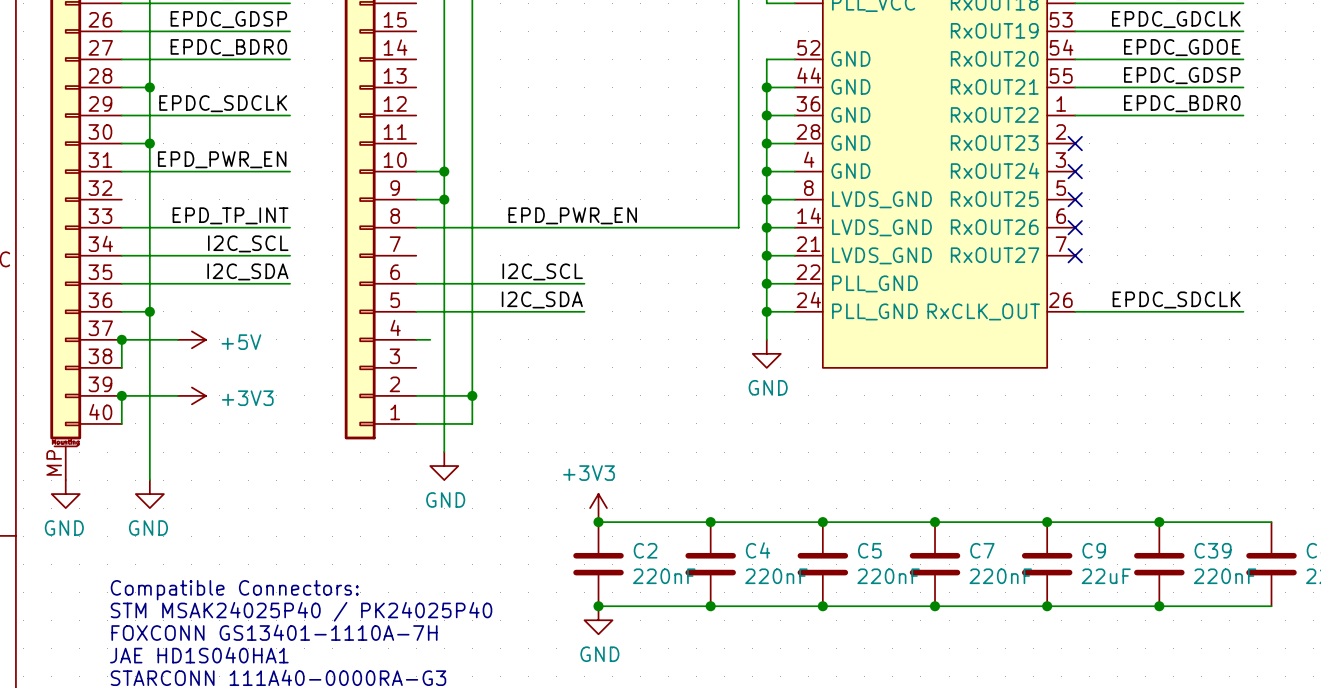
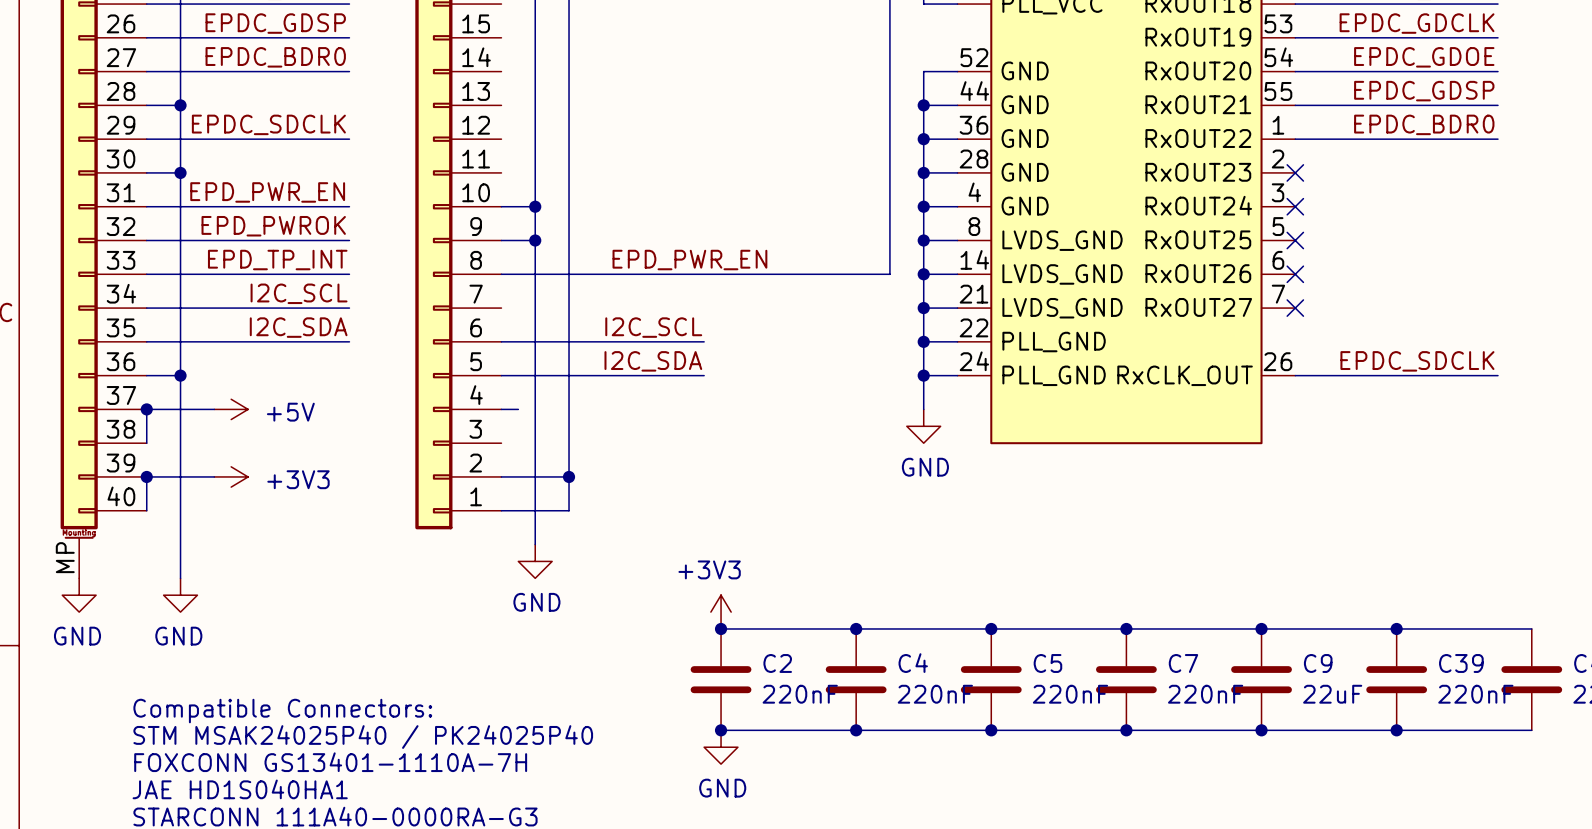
label: none -> EPD_PWROK (273, 226)
wire: none -> (146, 240) (349, 240)

